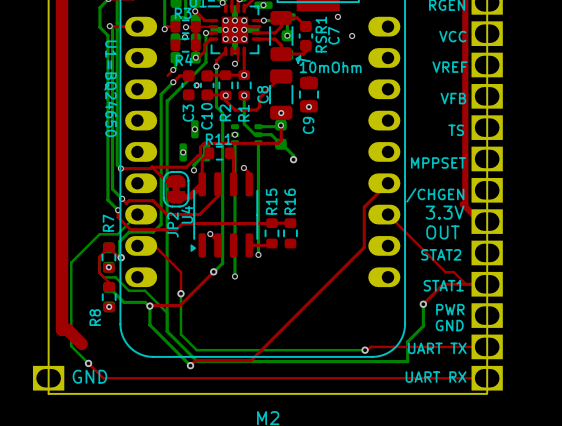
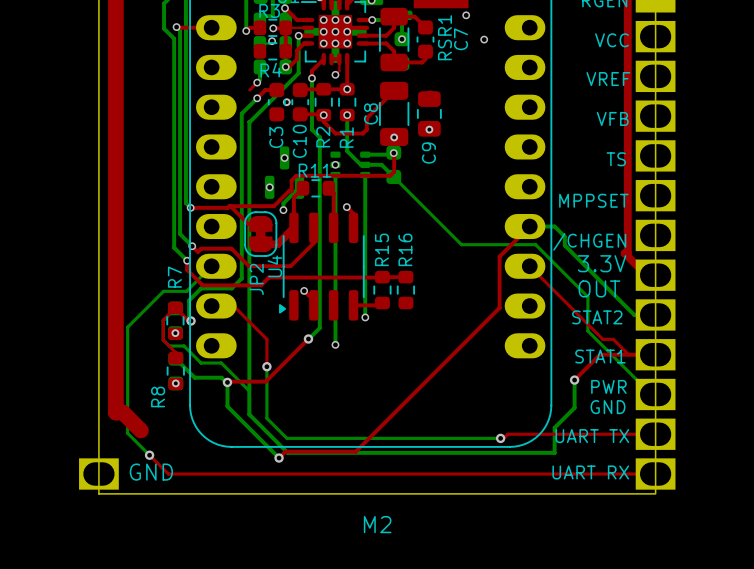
line: (296, 58) (298, 62) (300, 56) (296, 58) -> none
line: (296, 58) (309, 61) -> none
RSR1 value: 10mOhm (330, 67) -> none
text: U1=BQ24650 (110, 88) -> none
bottom track: (280, 144) (293, 155) (293, 159) -> (393, 176) (461, 244) (535, 244) (587, 296) (587, 331) (651, 394)
via: (293, 159) -> none
bottom track: none -> (529, 226) (554, 226) (564, 236) (564, 245) (634, 314) (655, 314)

